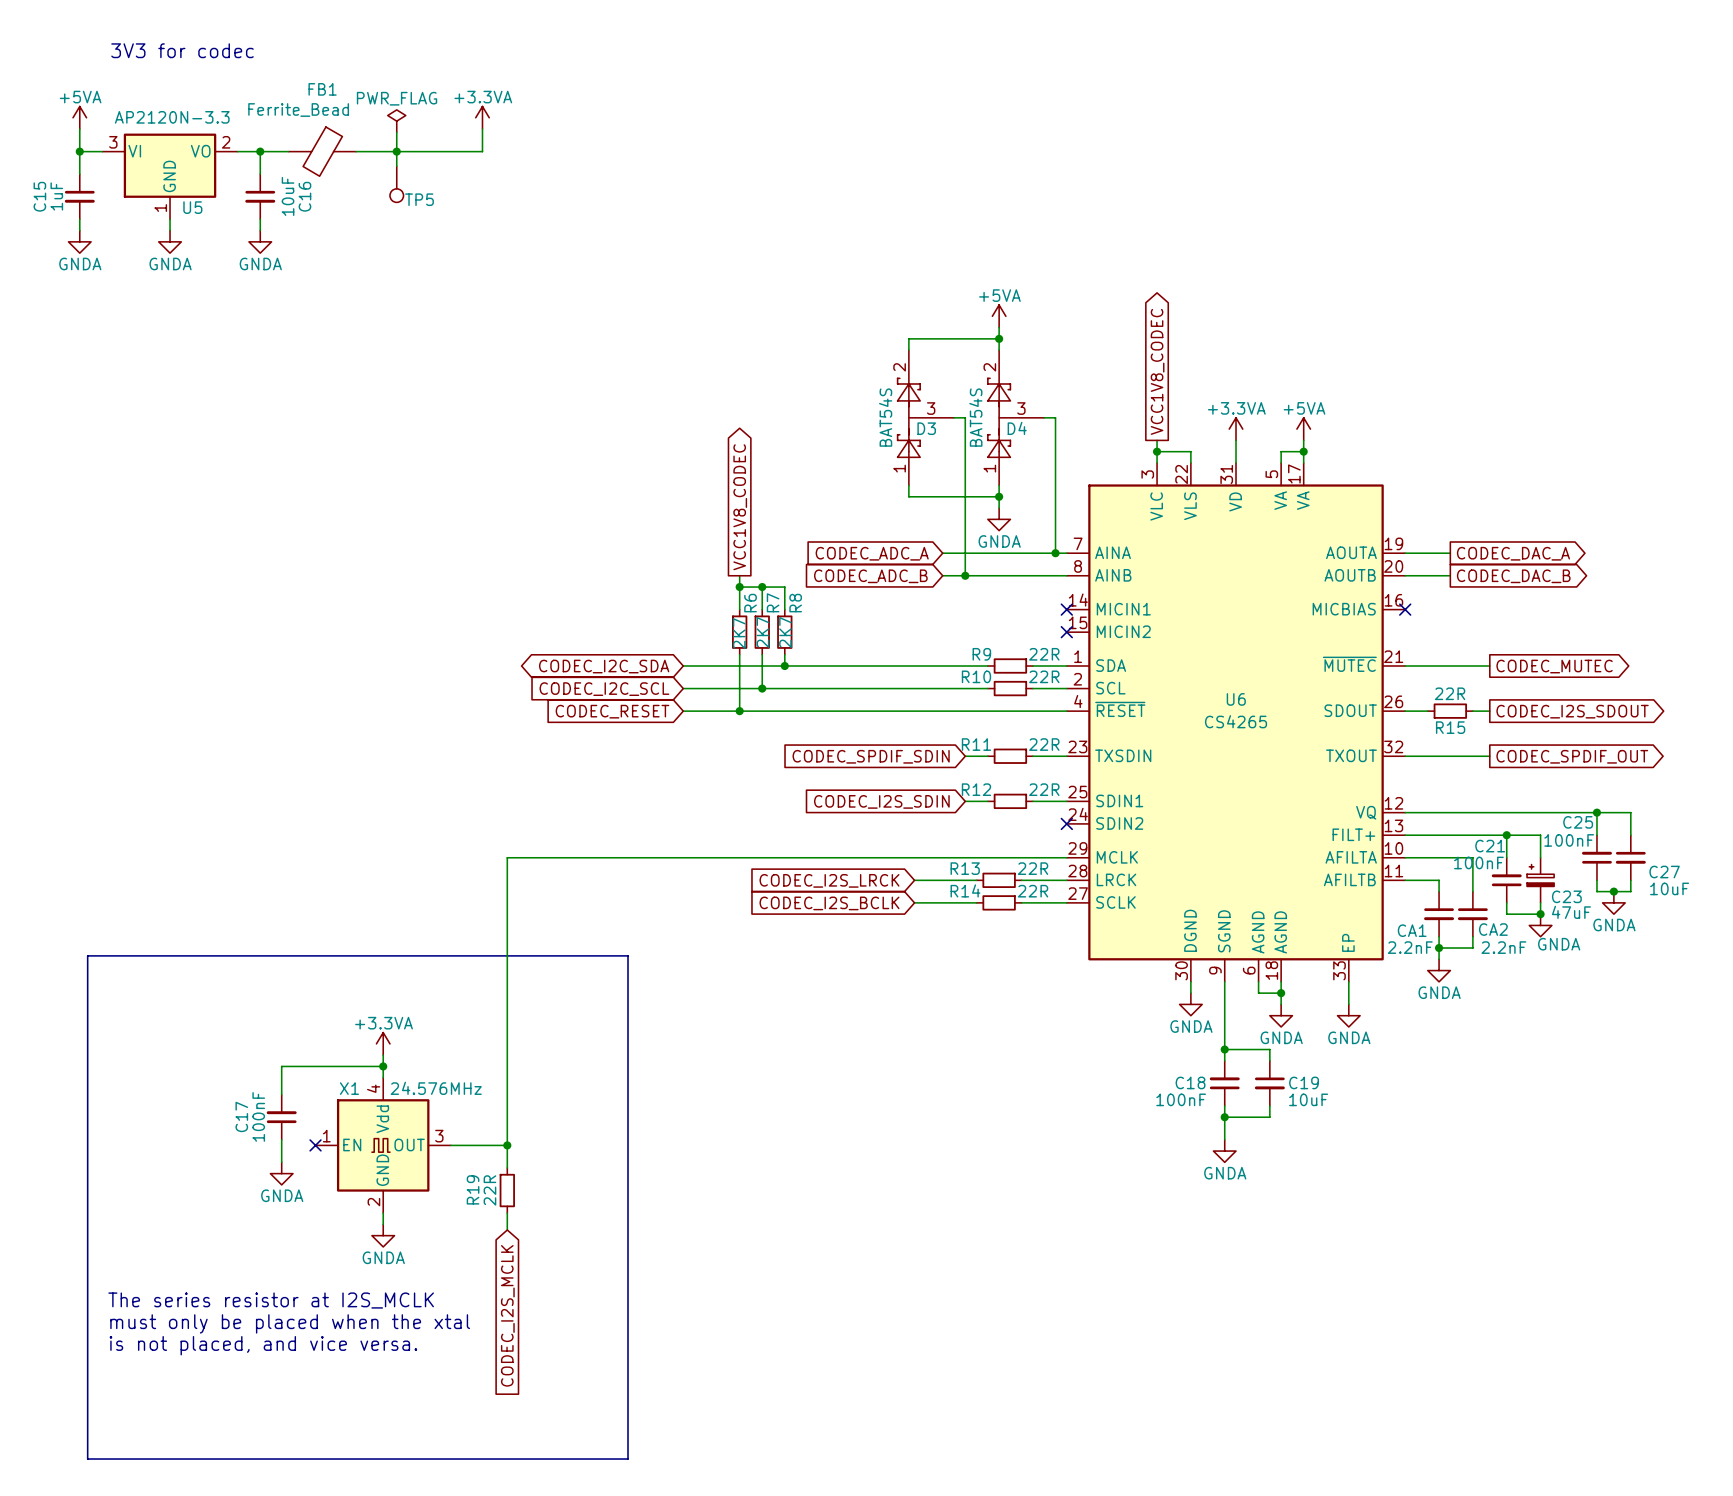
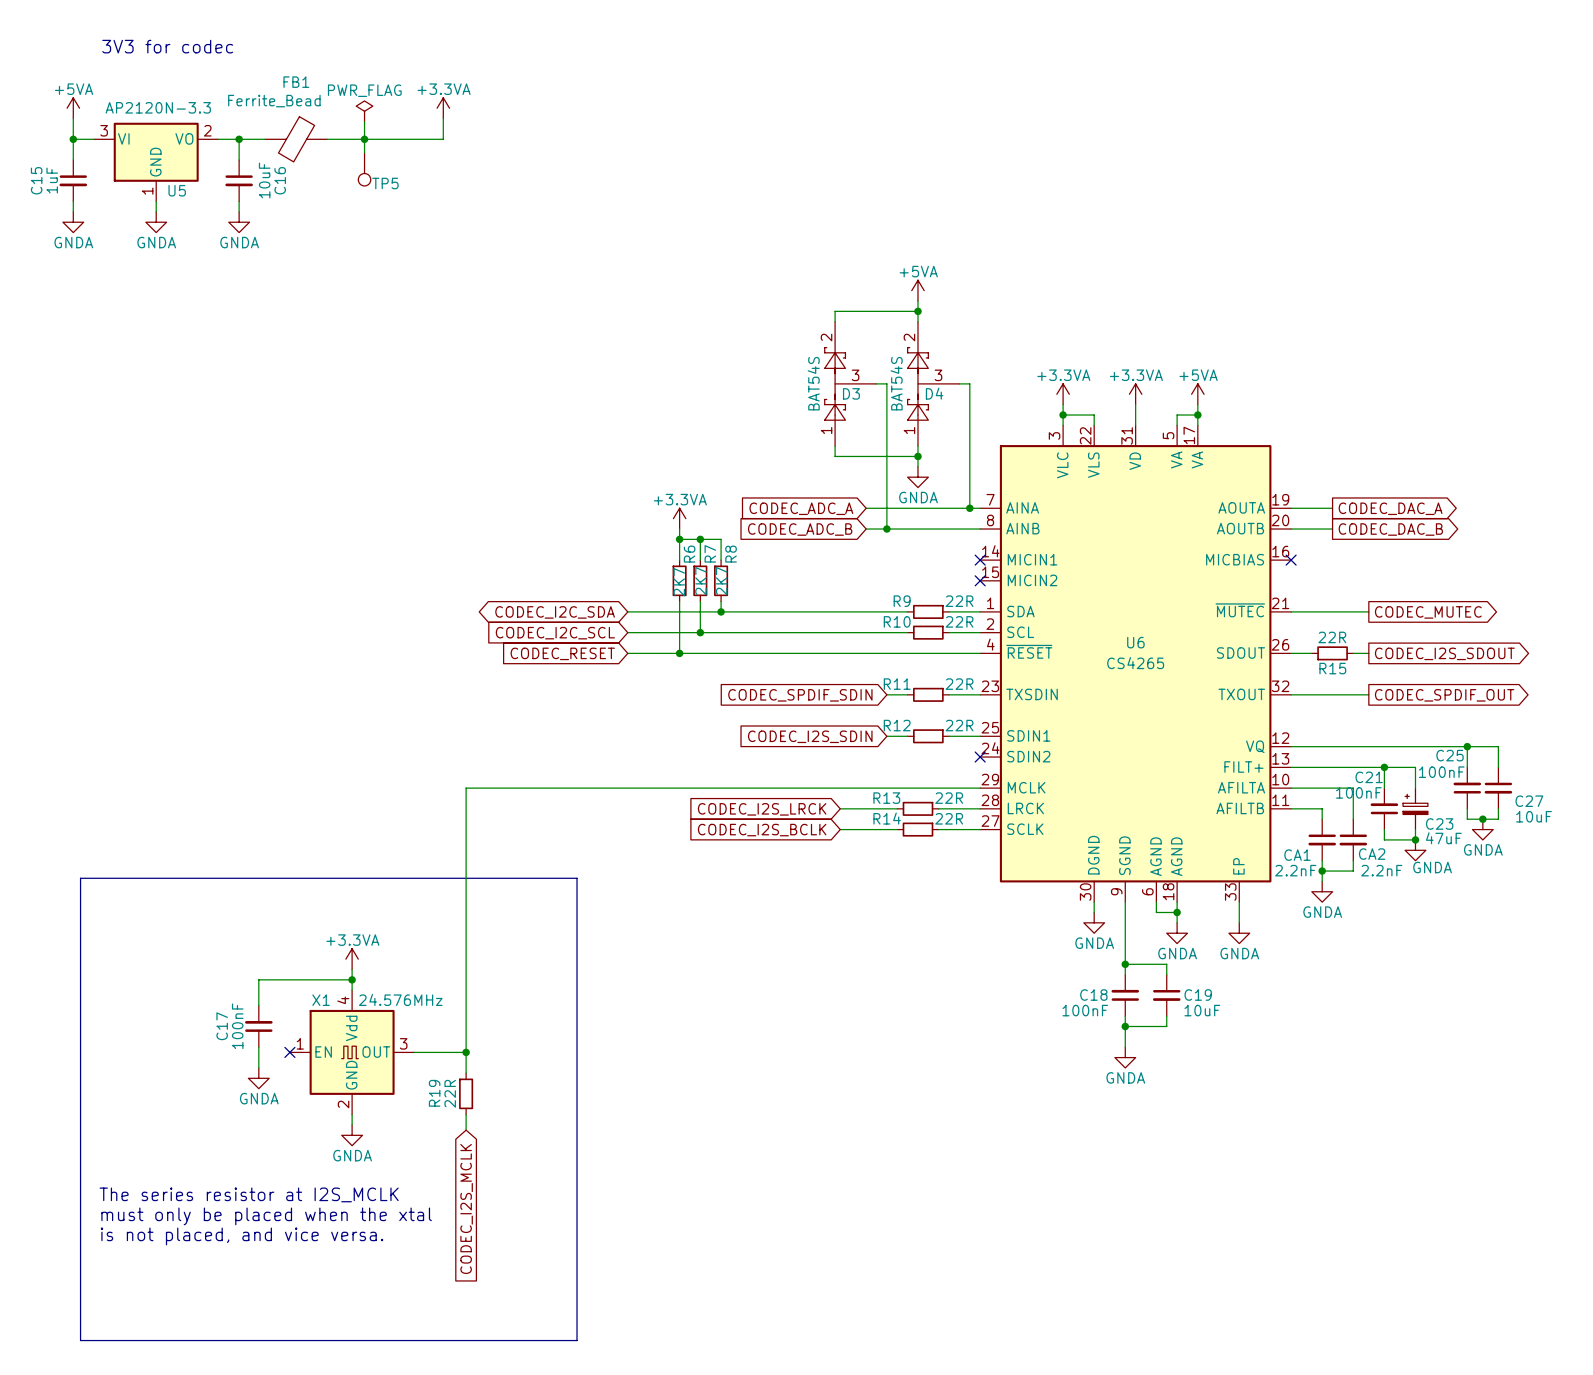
global label: VCC1V8_CODEC (1157, 371) -> none
power symbol: none -> +3.3VA (1063, 394)
global label: VCC1V8_CODEC (740, 507) -> none
power symbol: none -> +3.3VA (679, 518)

